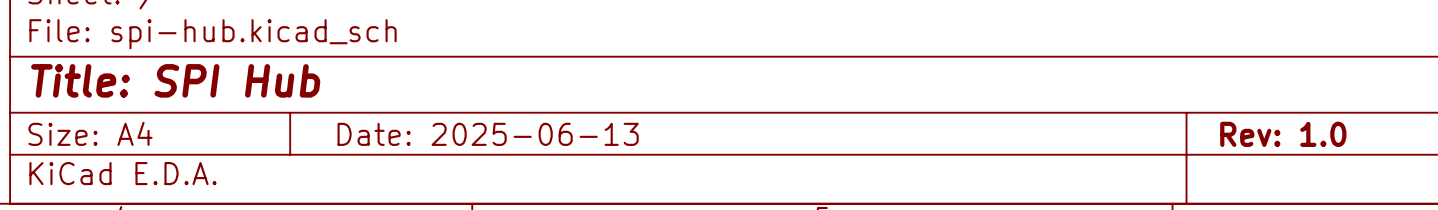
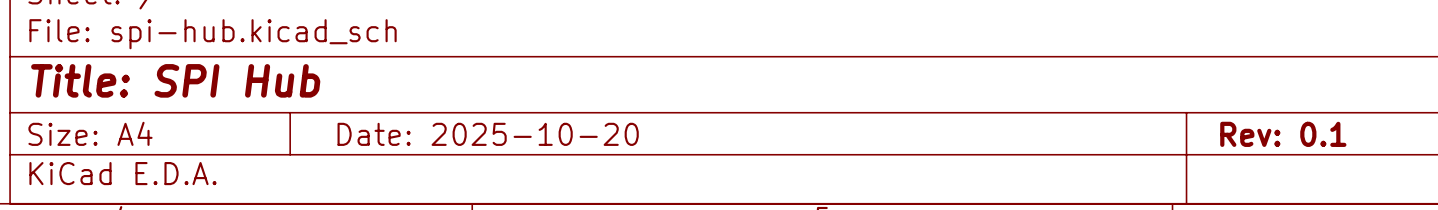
title block: Date: 2025-06-13 (488, 134) -> Date: 2025-10-20 (488, 134)
title block: Rev: 1.0 (1283, 134) -> Rev: 0.1 (1283, 134)

